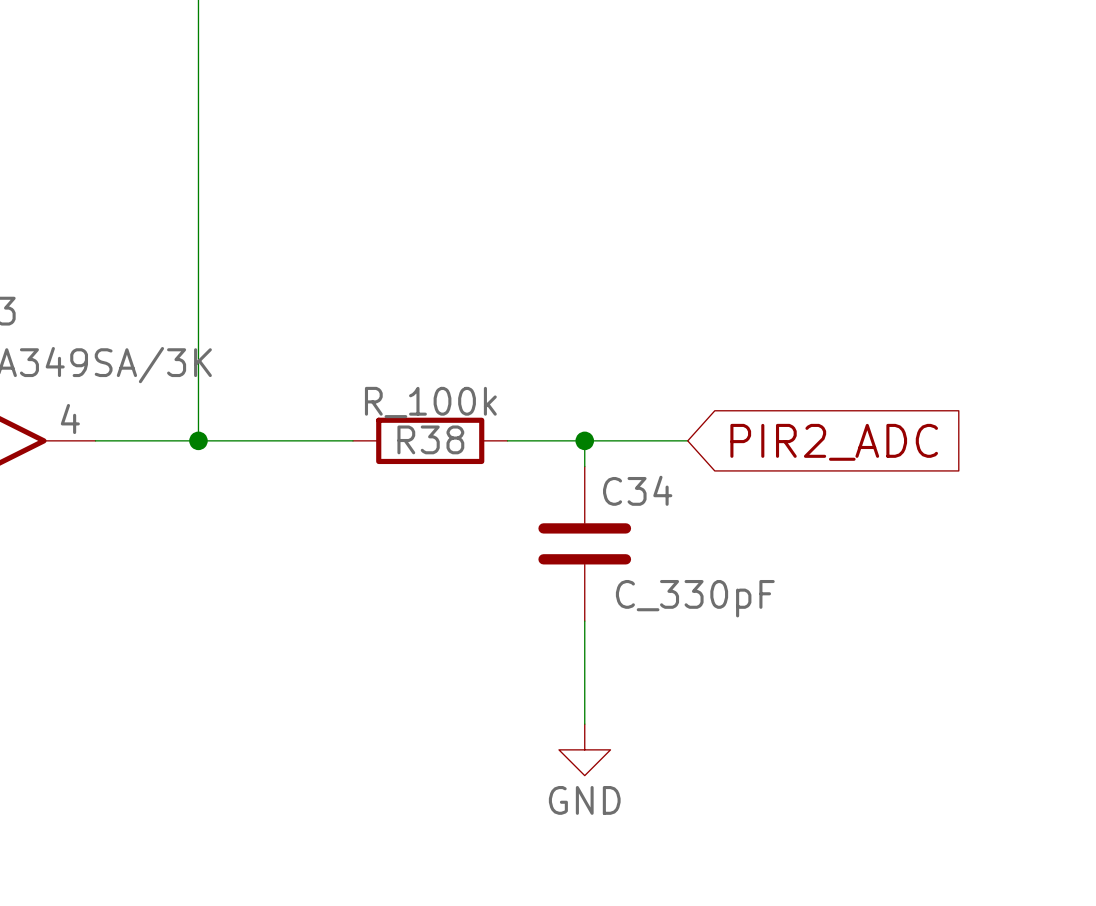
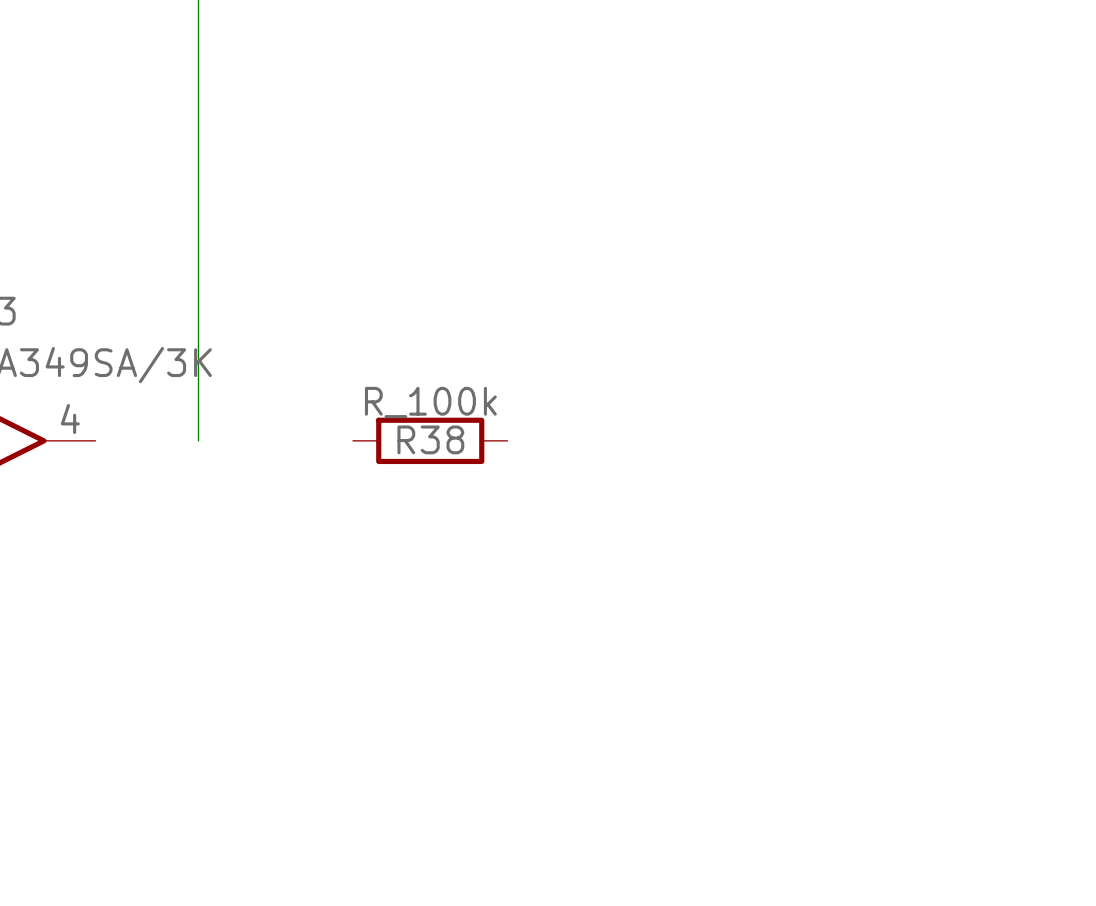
wire: (95, 440) (352, 440) -> none
junction: (198, 440) -> none
wire: (507, 440) (687, 440) -> none
wire: (584, 440) (584, 466) -> none
junction: (584, 440) -> none
global label: PIR2_ADC (834, 442) -> none
C34: C_330pF (584, 543) -> none
wire: (584, 621) (584, 724) -> none
power symbol: GND (584, 749) -> none

